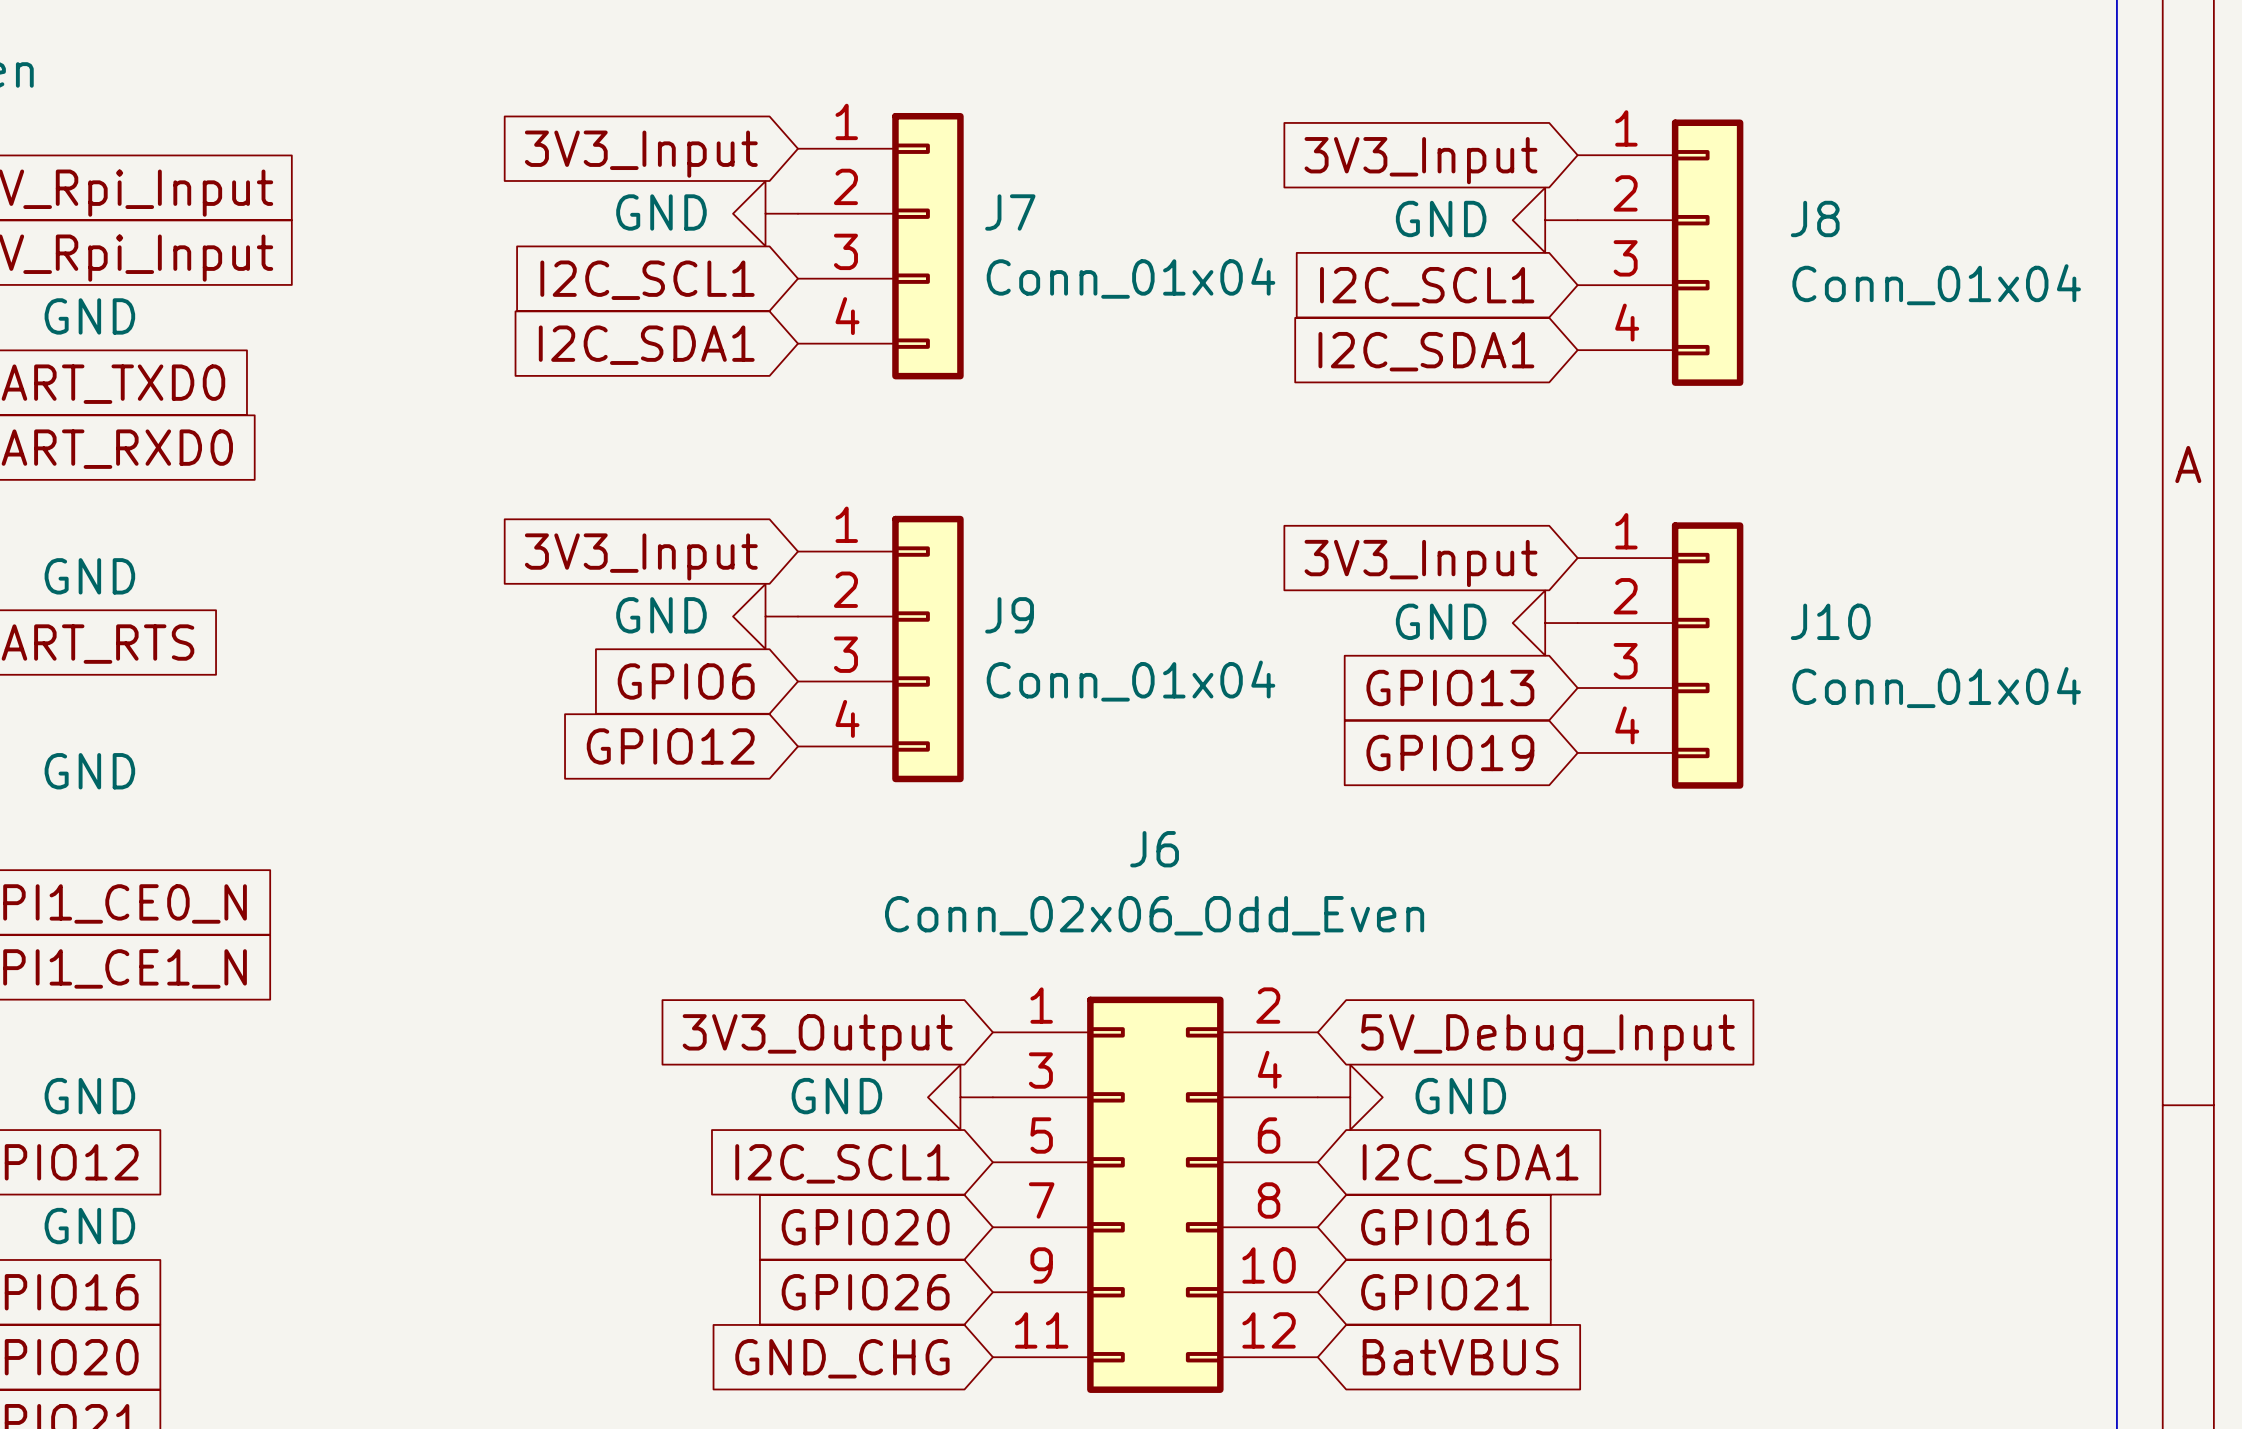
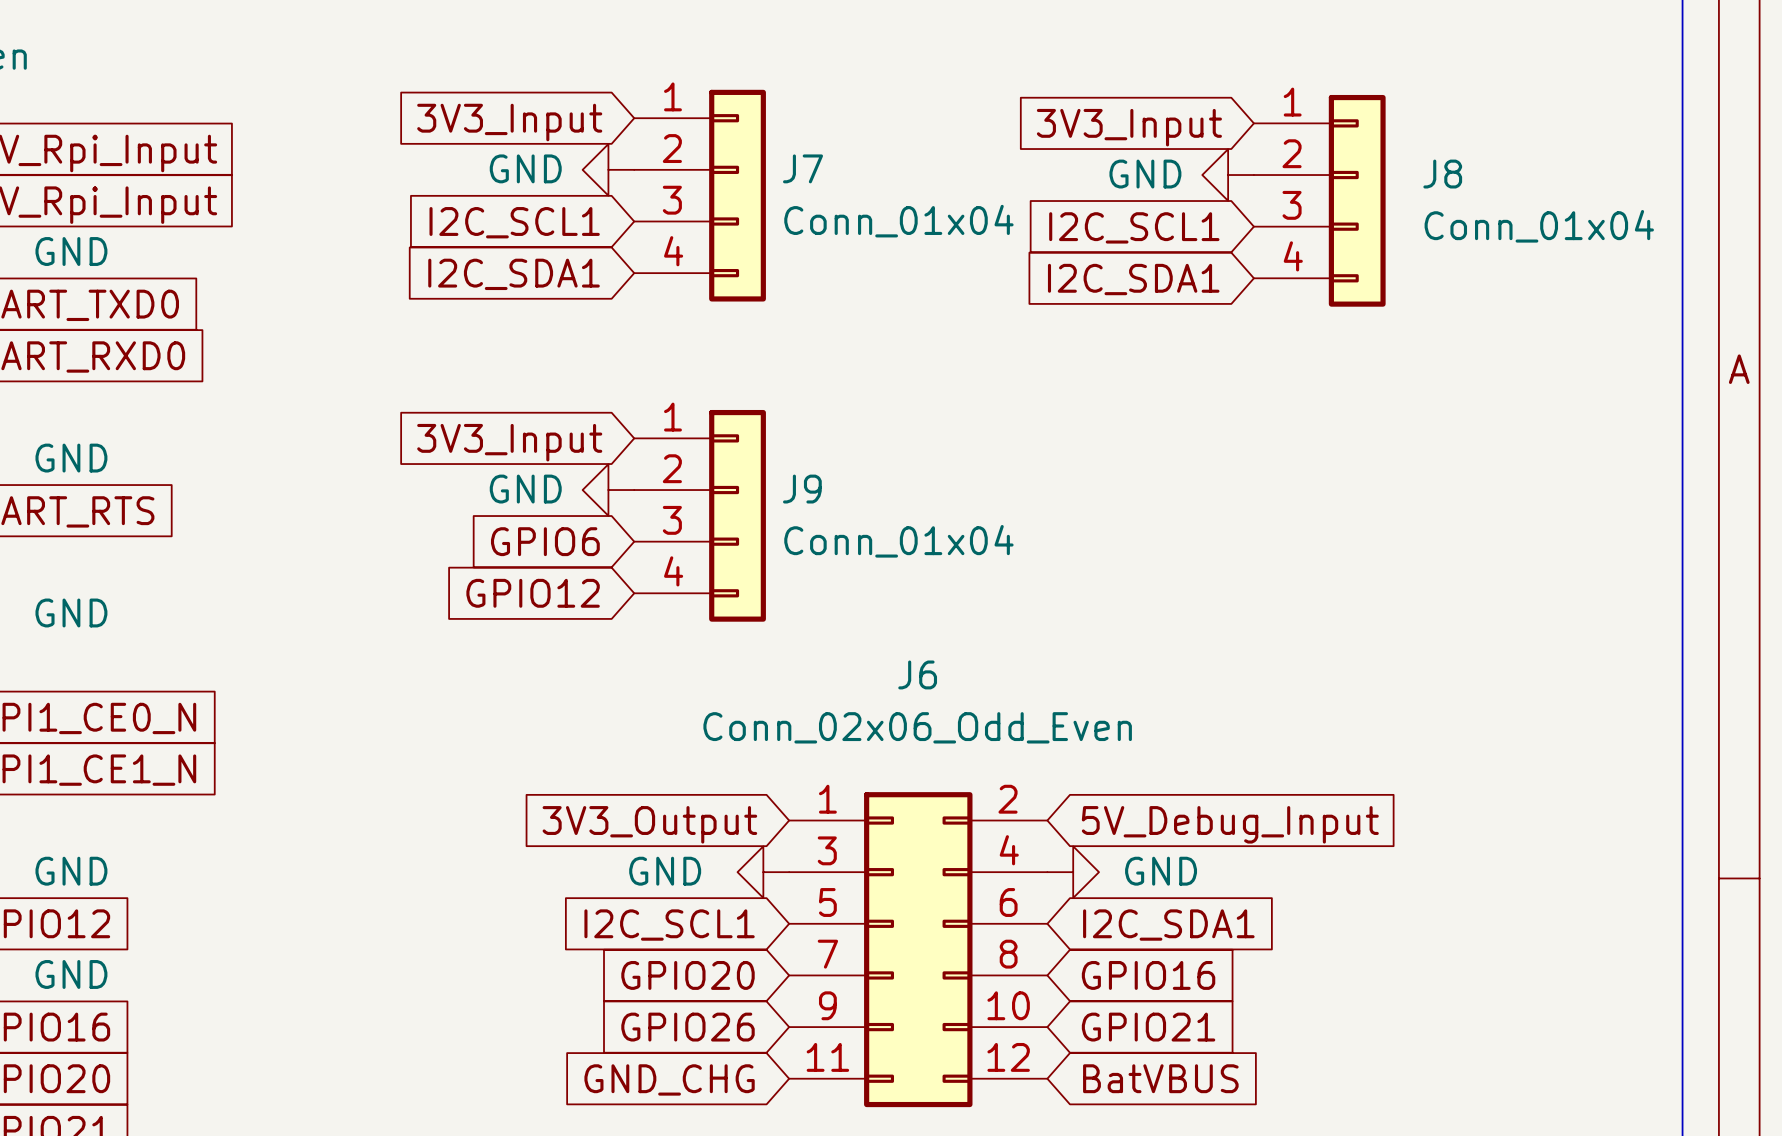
global label: 3V3_Input (1420, 563) -> none
power symbol: GND (1545, 623) -> none
J10: Conn_01x04 (1660, 655) -> none
global label: GPIO13 (1450, 688) -> none
global label: GPIO19 (1450, 752) -> none

